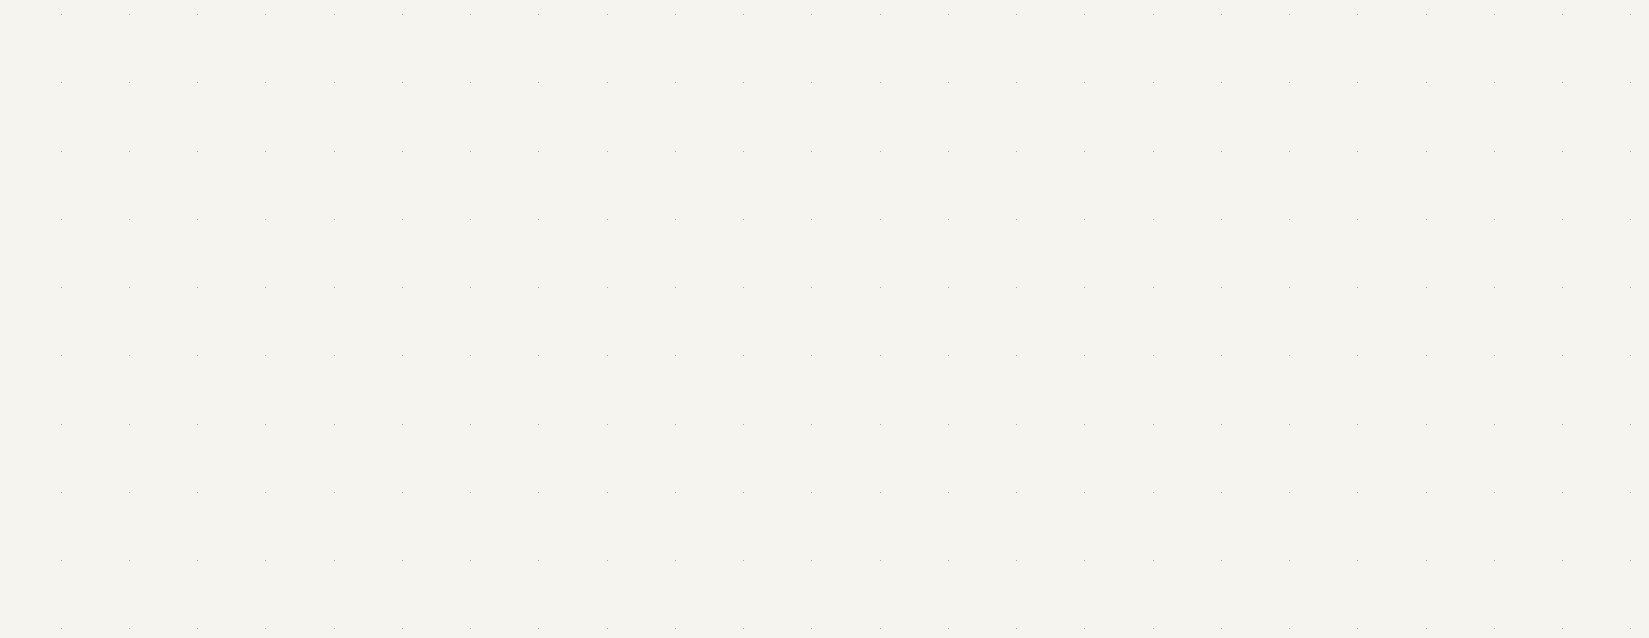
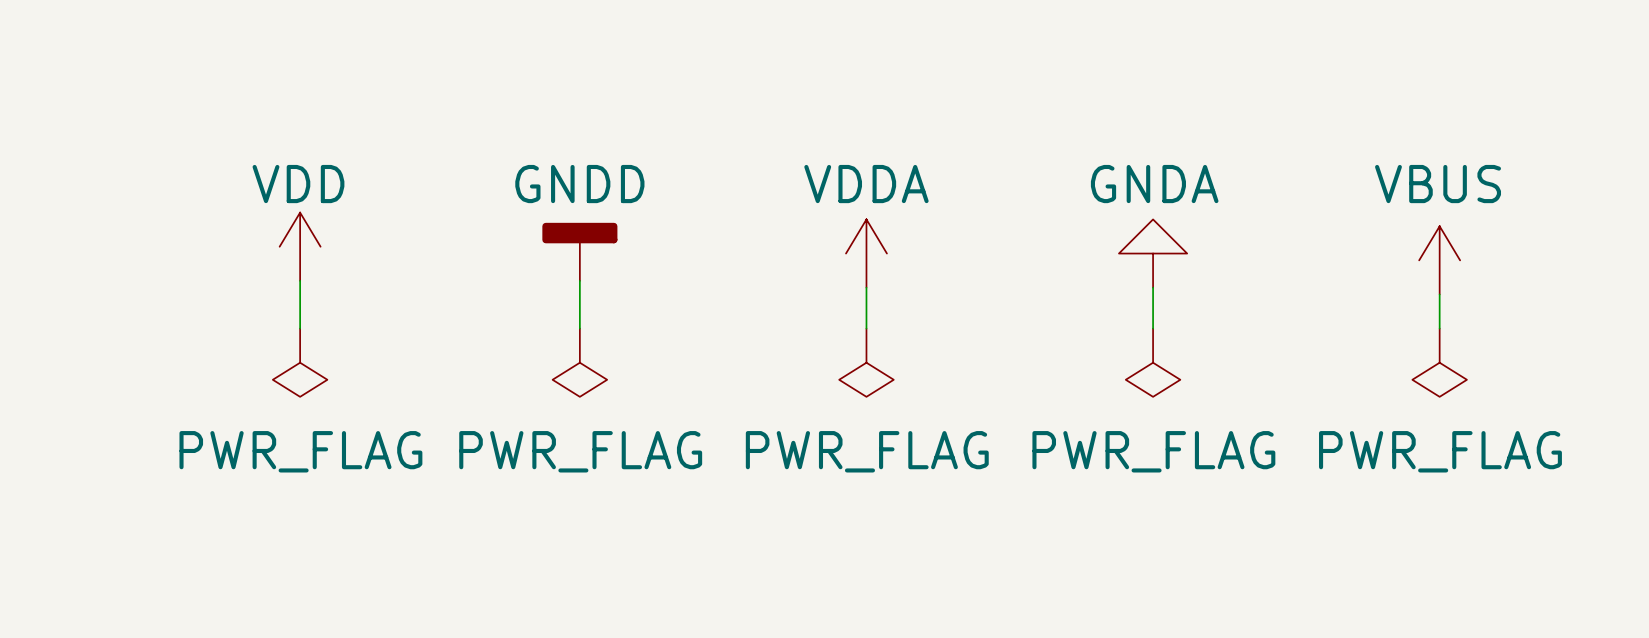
power symbol: none -> VDD (300, 246)
power symbol: none -> GNDD (579, 251)
power symbol: none -> VDDA (866, 253)
power symbol: none -> GNDA (1153, 253)
power symbol: none -> VBUS (1439, 260)
wire: none -> (300, 280) (300, 328)
wire: none -> (579, 280) (579, 328)
wire: none -> (866, 287) (866, 328)
wire: none -> (1153, 287) (1153, 328)
wire: none -> (1439, 294) (1439, 328)
power symbol: none -> PWR_FLAG (300, 362)
power symbol: none -> PWR_FLAG (579, 362)
power symbol: none -> PWR_FLAG (866, 362)
power symbol: none -> PWR_FLAG (1153, 362)
power symbol: none -> PWR_FLAG (1439, 362)

